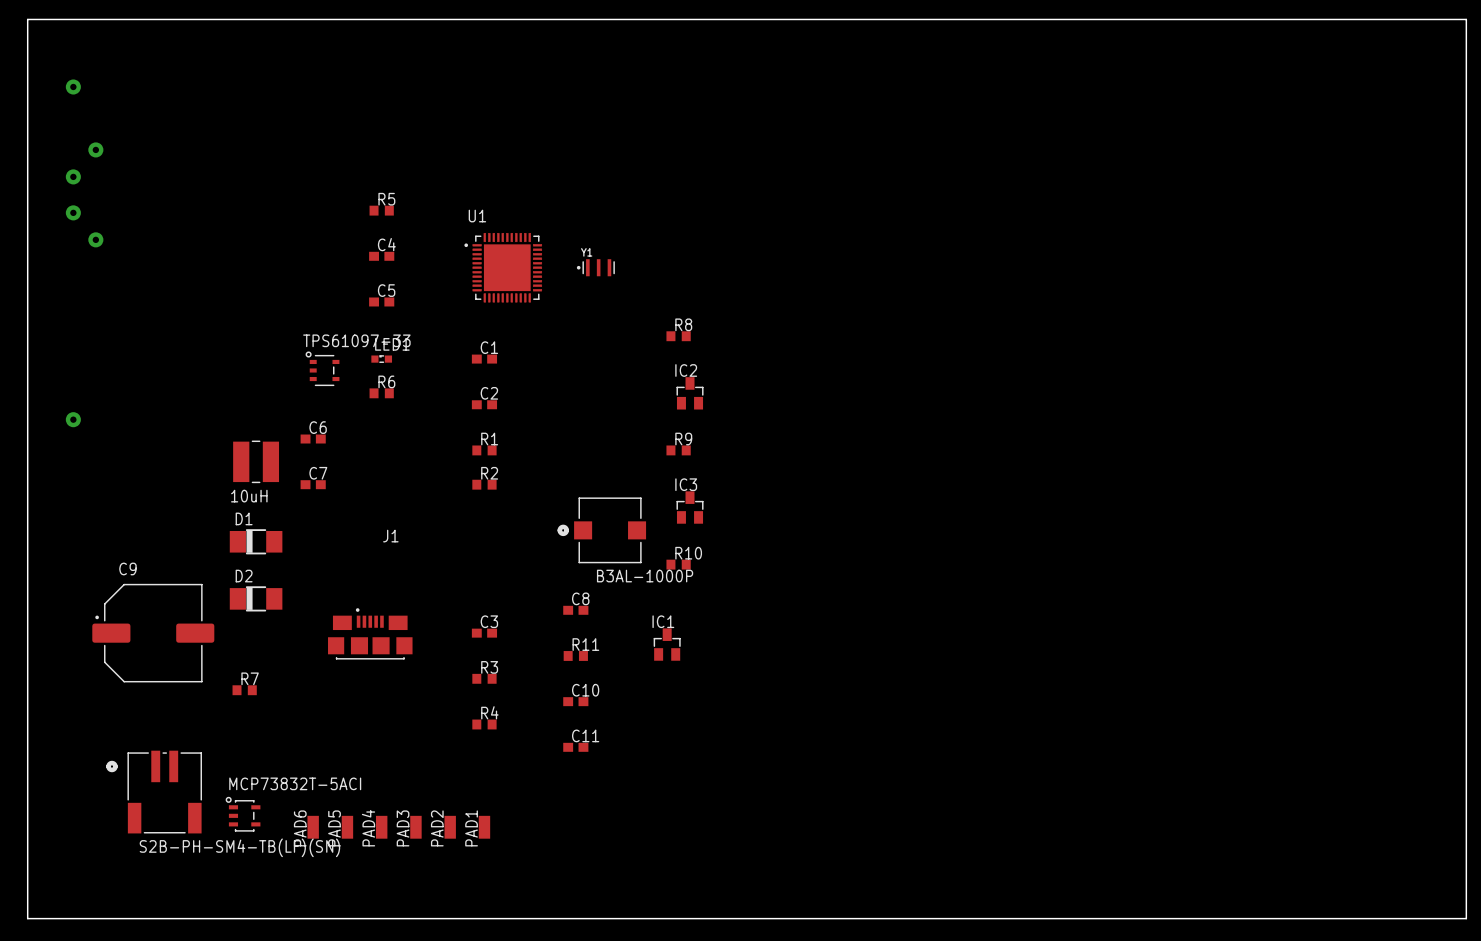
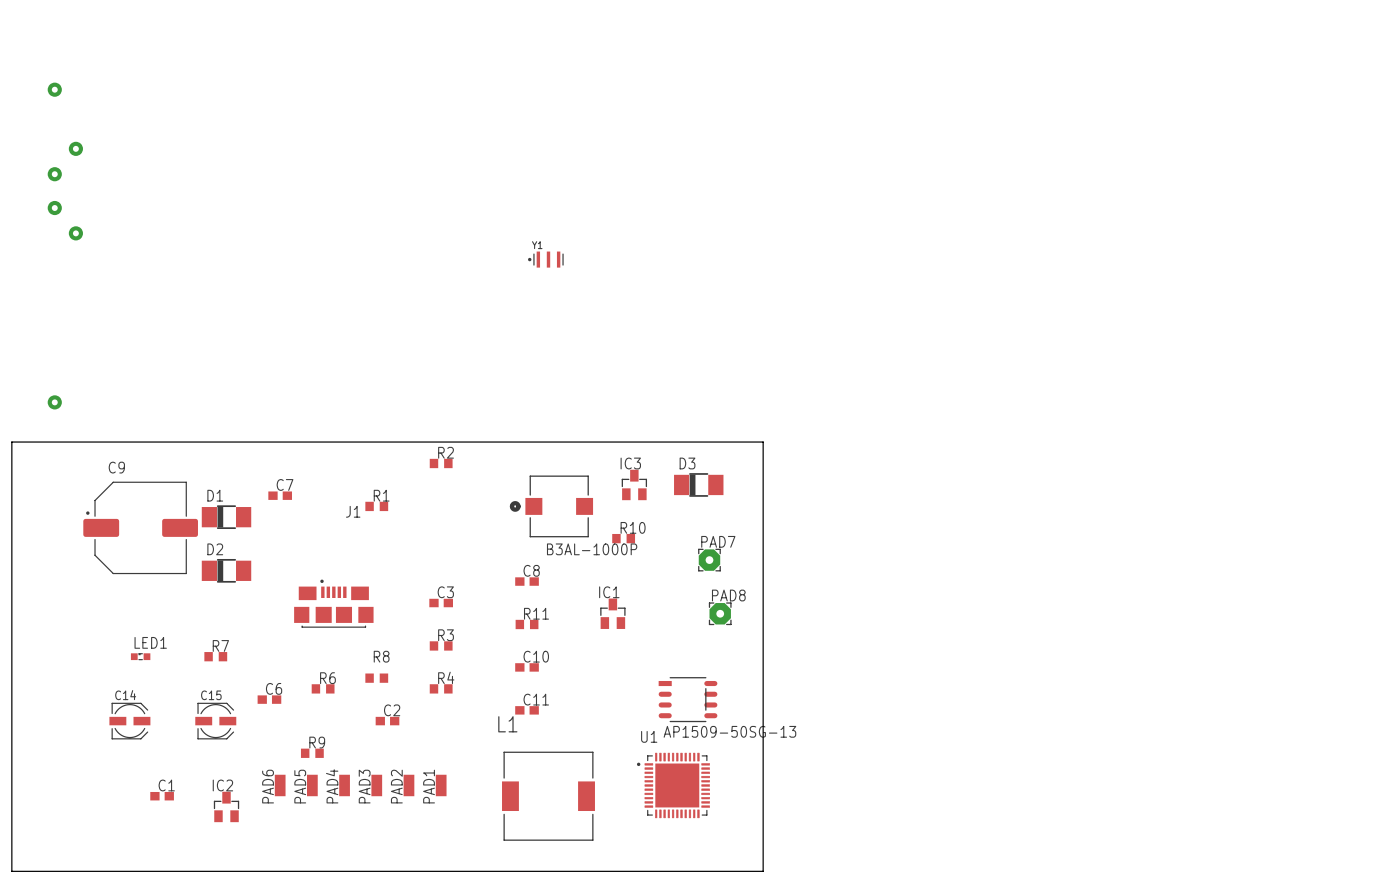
R5: (381, 210) -> none
C4: (381, 256) -> none
U1 position: (503, 267) -> (673, 785)
C5: (381, 301) -> none
R8 name position: R8 (683, 324) -> R8 (381, 656)
R8 position: (678, 336) -> (376, 678)
LED1 position: (381, 359) -> (140, 656)
C1 position: (484, 359) -> (162, 796)
part: TPS61097-33 (322, 368) -> none
R6 position: (381, 393) -> (323, 688)
IC2 position: (690, 393) -> (226, 806)
C2 position: (484, 404) -> (387, 721)
C6 position: (313, 439) -> (269, 699)
R1 position: (484, 450) -> (376, 506)
R9 position: (678, 450) -> (312, 753)
board edge: (27, 461) (27, 19) (1466, 19) (1466, 918) (827, 918) -> (11, 442) (763, 442) (763, 871)
part: 10uH (256, 461) -> none
C7 position: (313, 484) -> (280, 495)
D3: none -> (698, 484)
PAD7: none -> (709, 560)
C9 position: (153, 633) -> (140, 527)
PAD8: none -> (720, 613)
part: none -> AP1509-50SG-13 (688, 699)
C14: none -> (129, 721)
C15: none -> (215, 721)
part: S2B-PH-SM4-TB(LF)(SN) (154, 792) -> none
part: MCP73832T-5ACI (243, 814) -> none
L1: none -> (548, 796)

